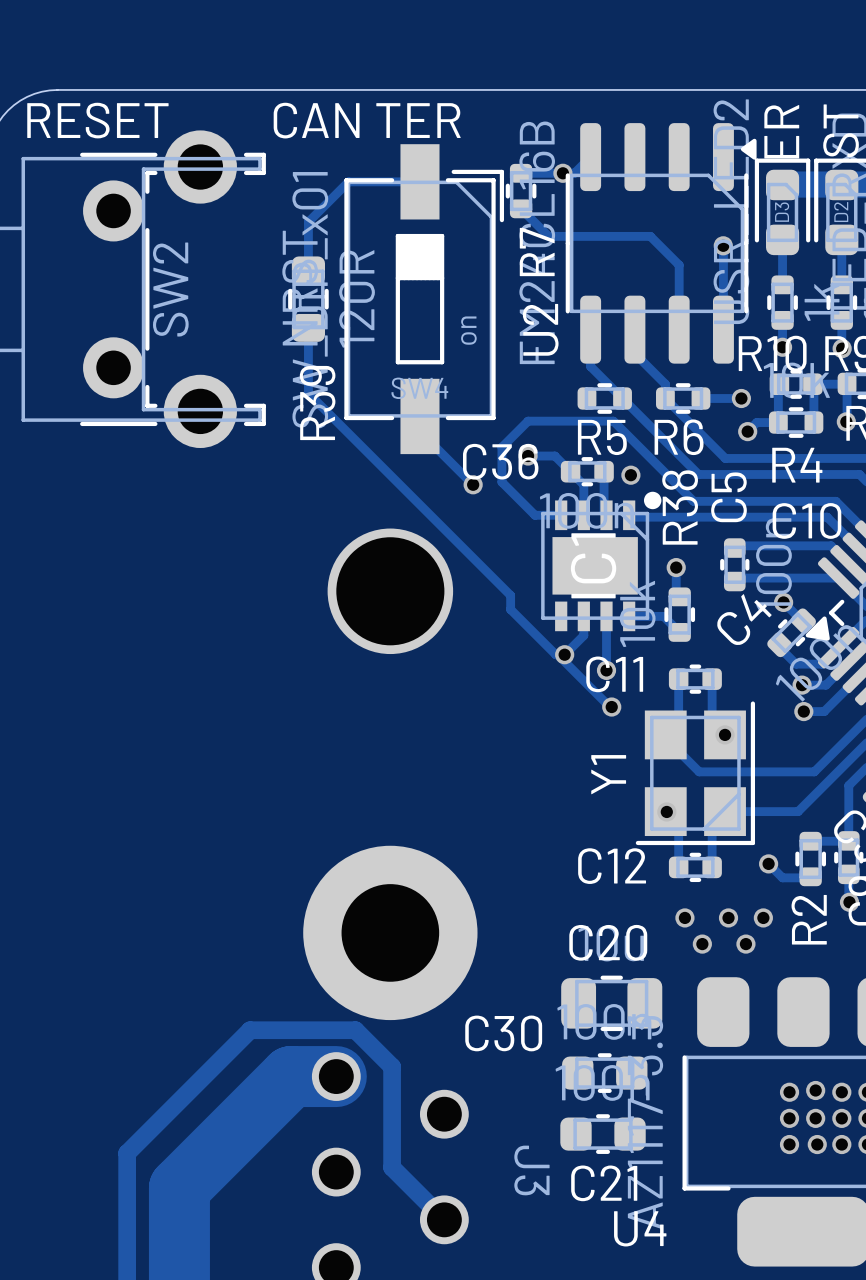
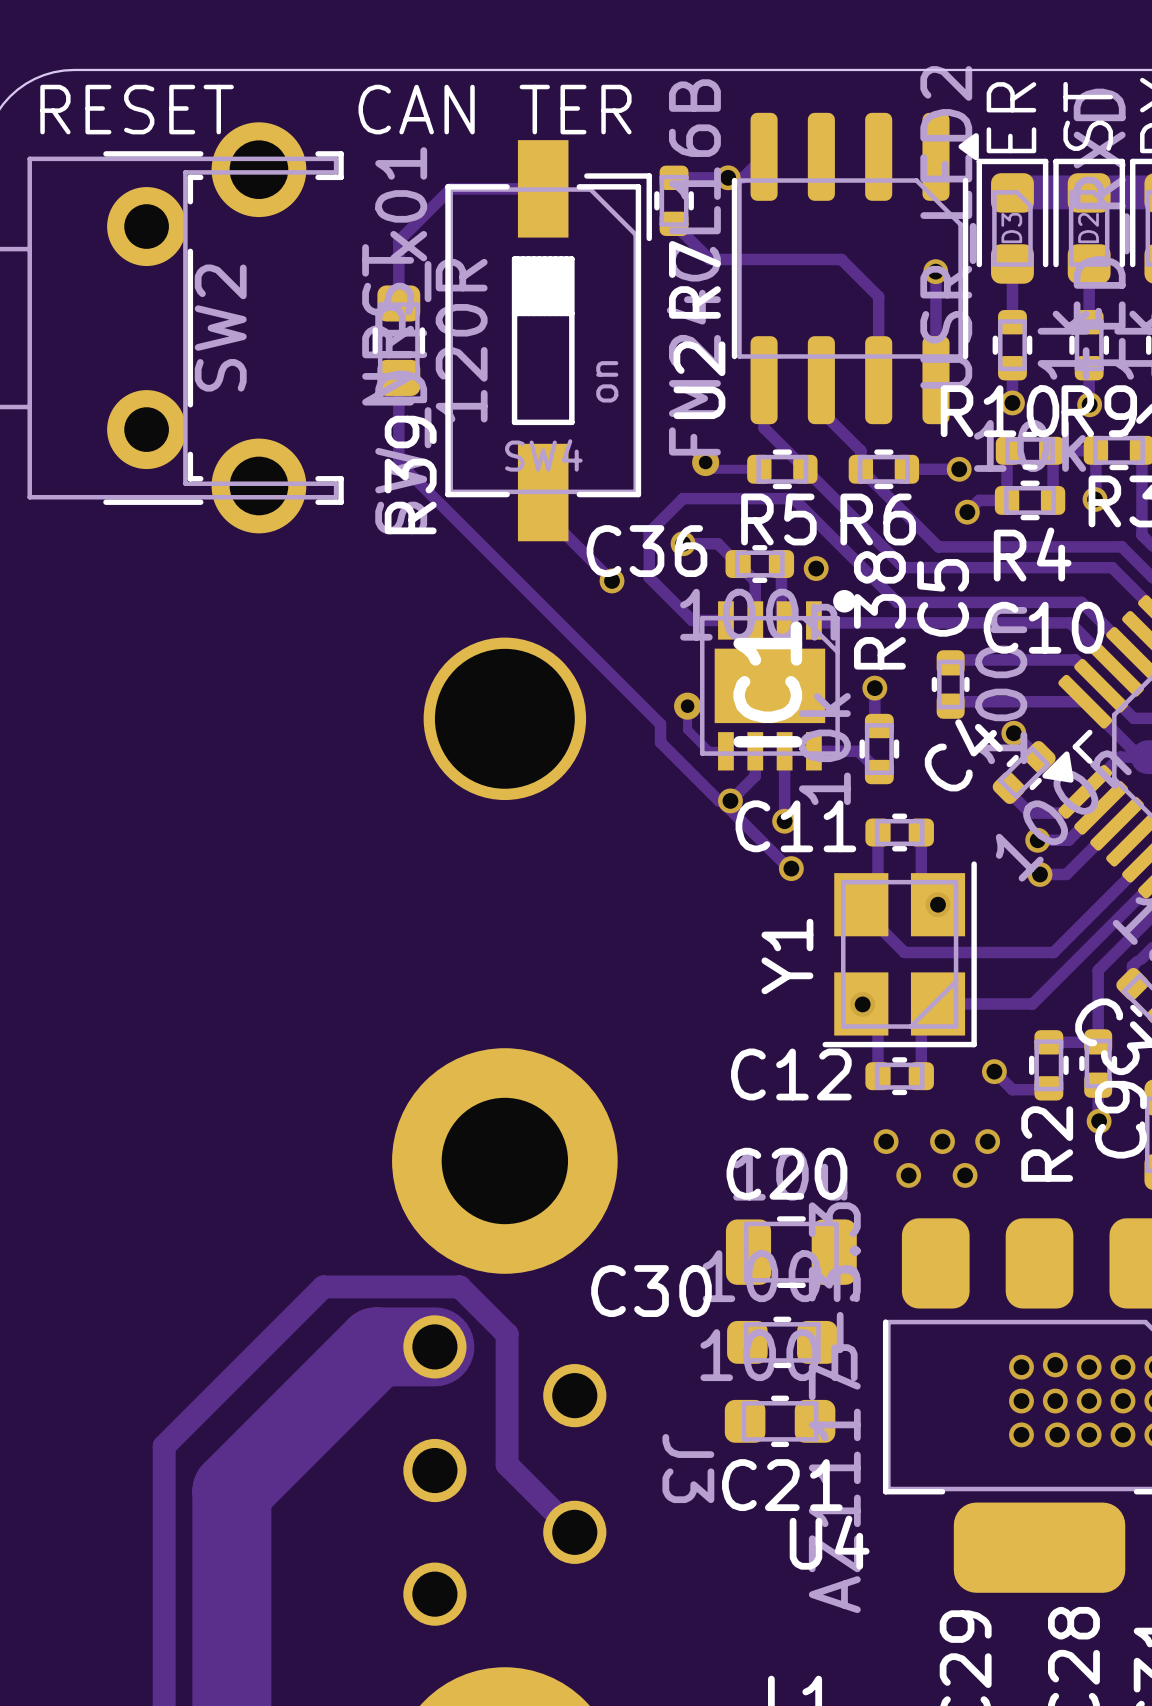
track: none -> (705, 462) (712, 469) (759, 469)
via: none -> (705, 462)
track: none -> (687, 706) (687, 729) (709, 751) (725, 751)
via: none -> (687, 706)

